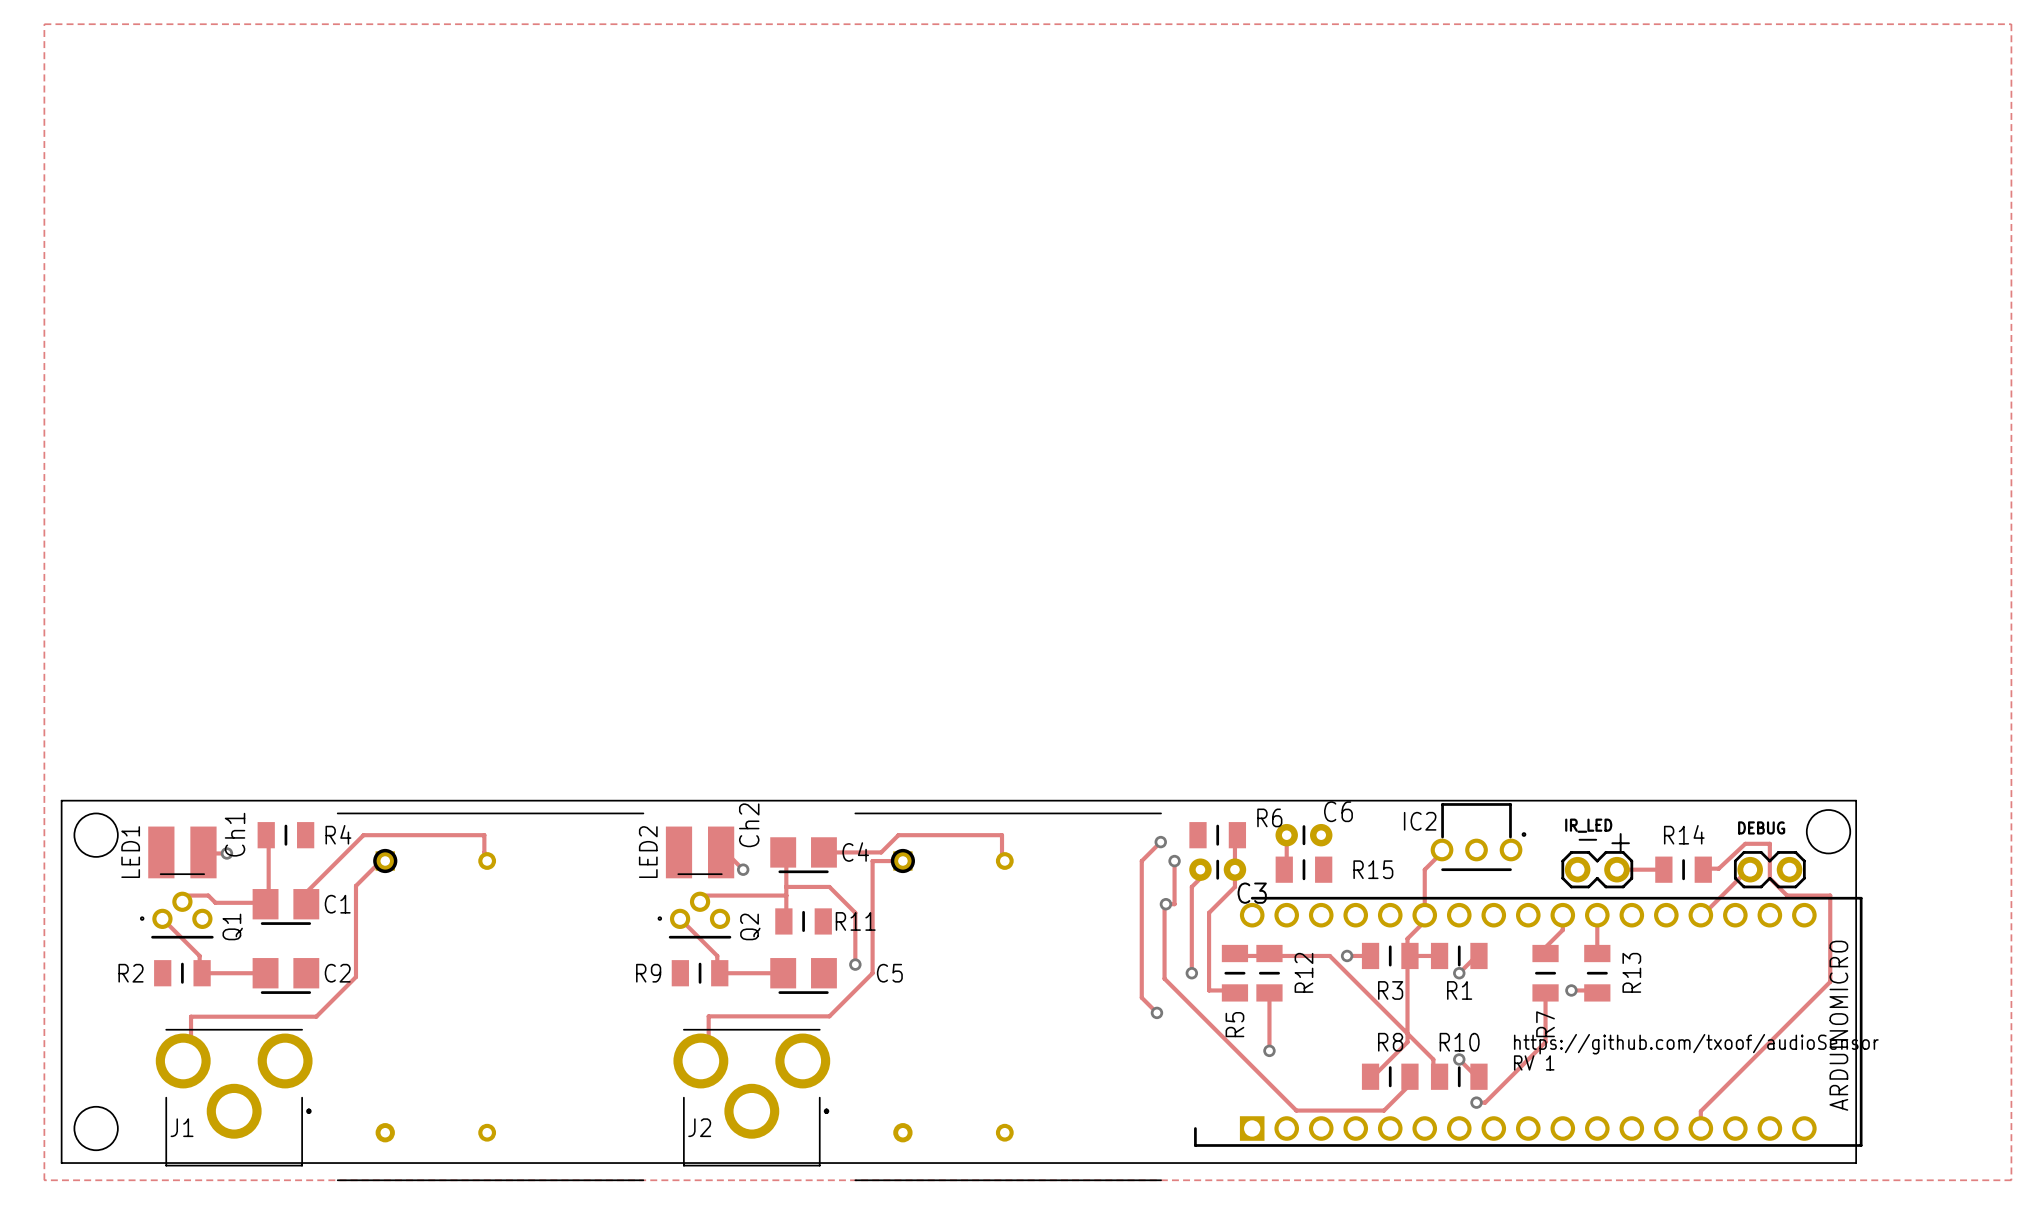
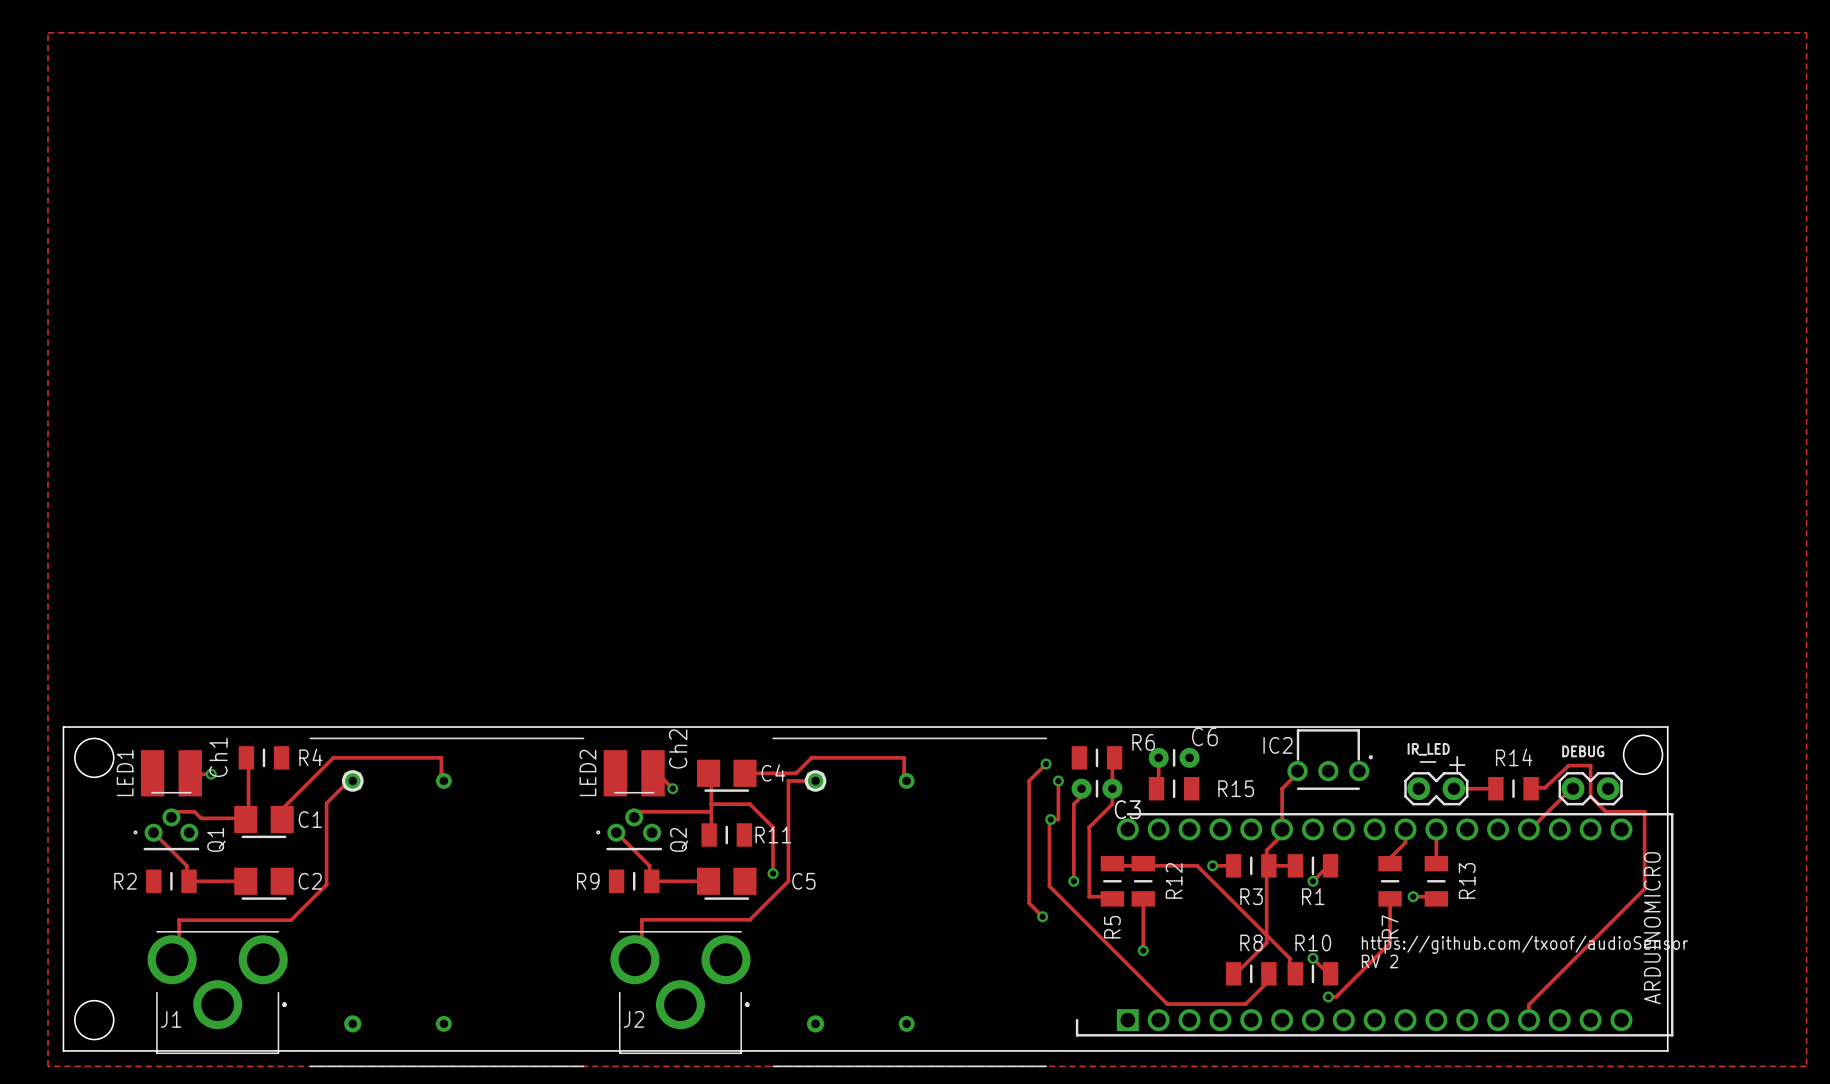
text: RV 1 (1534, 1062) -> RV 2 (1379, 961)

